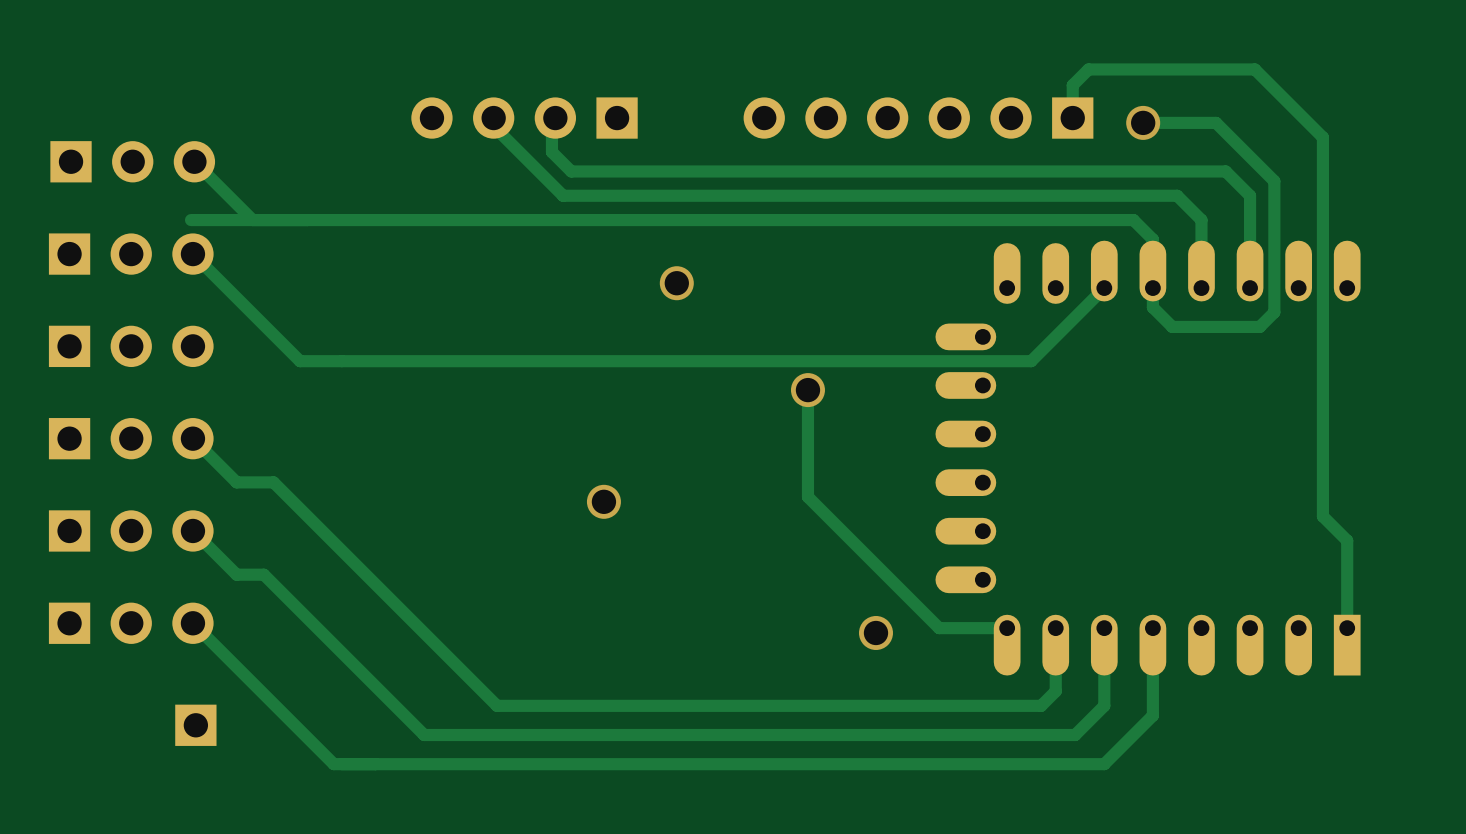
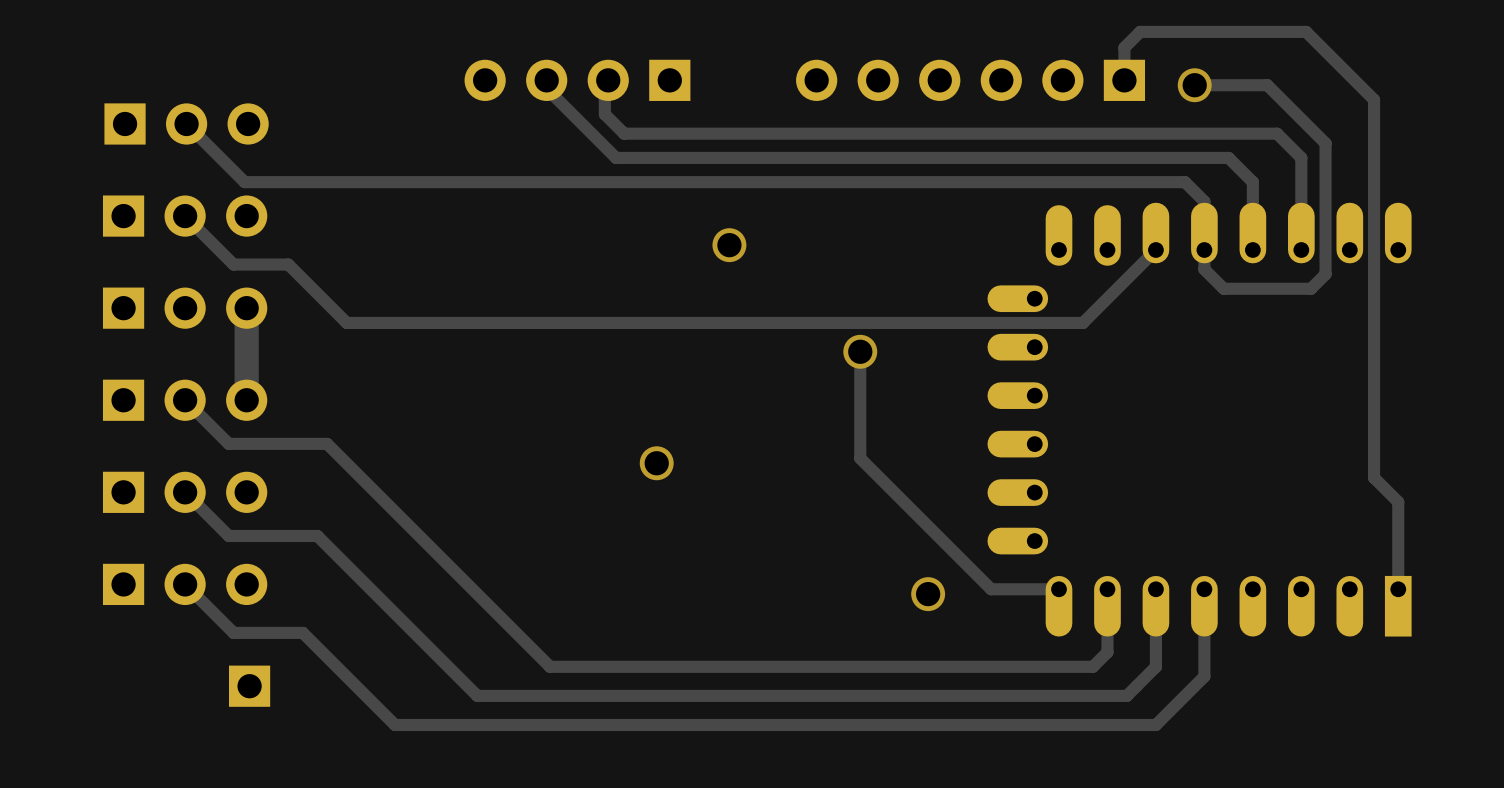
track: (194, 161) (252, 220) -> (186, 123) (244, 182)
track: (192, 254) (300, 361) -> (185, 216) (233, 264) (288, 264) (346, 322) (353, 322)
track: none -> (246, 308) (246, 400)
track: (192, 438) (236, 482) -> (185, 400) (228, 443) (290, 443)
track: (192, 530) (236, 574) -> (185, 492) (228, 535) (290, 535)
track: (192, 623) (333, 764) (341, 764) -> (185, 584) (233, 632) (302, 632) (394, 724)

